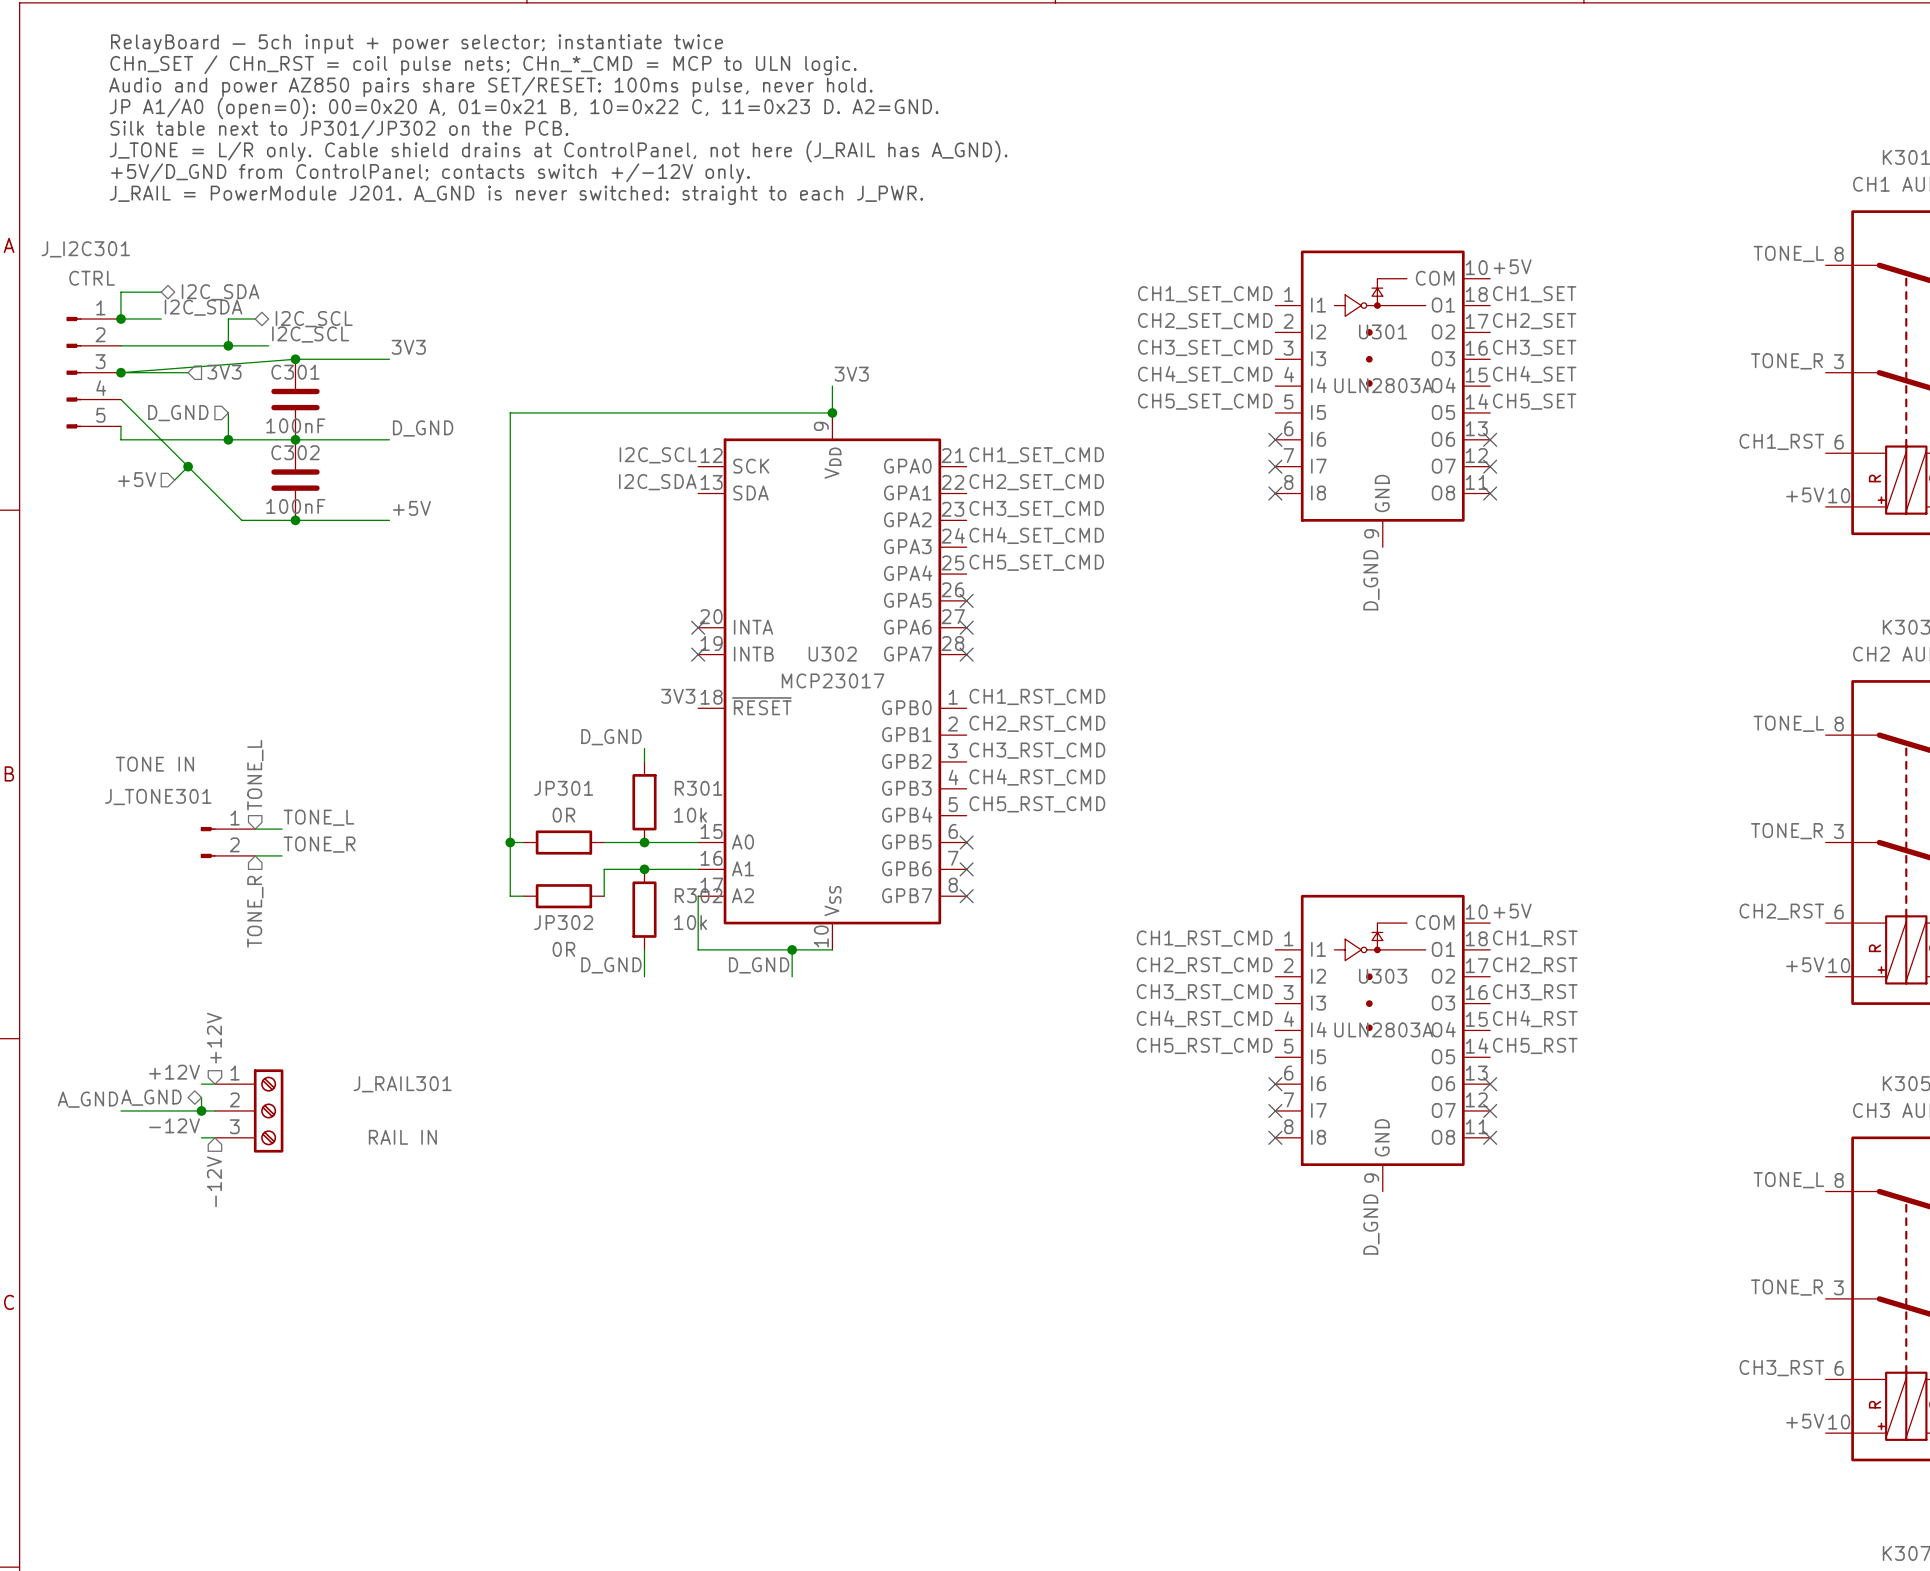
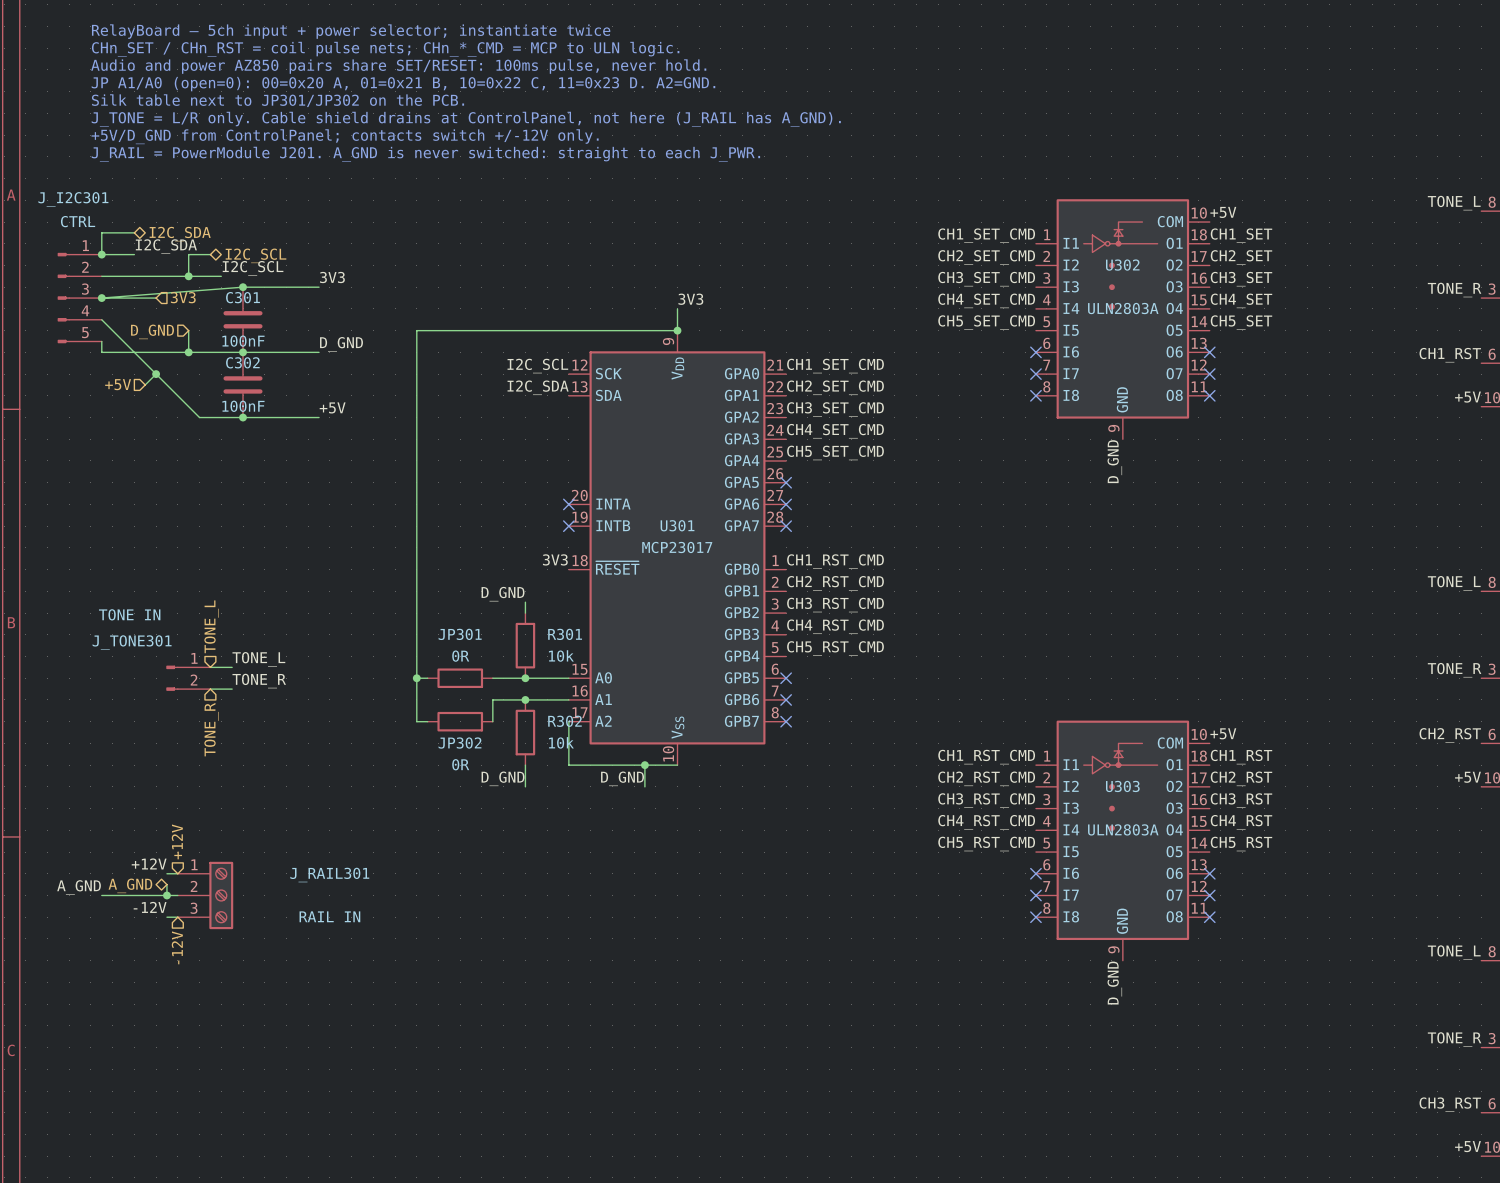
U301 name: U301 (1383, 331) -> U302 (1122, 265)
U302 name: U302 (832, 654) -> U301 (677, 525)

